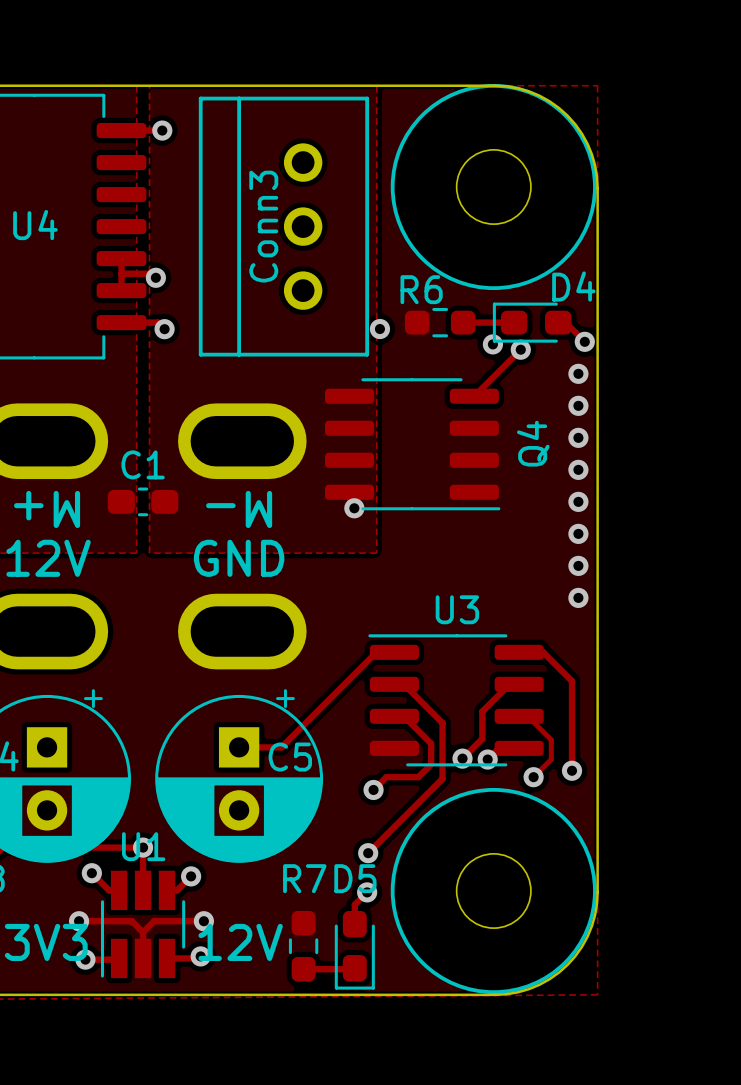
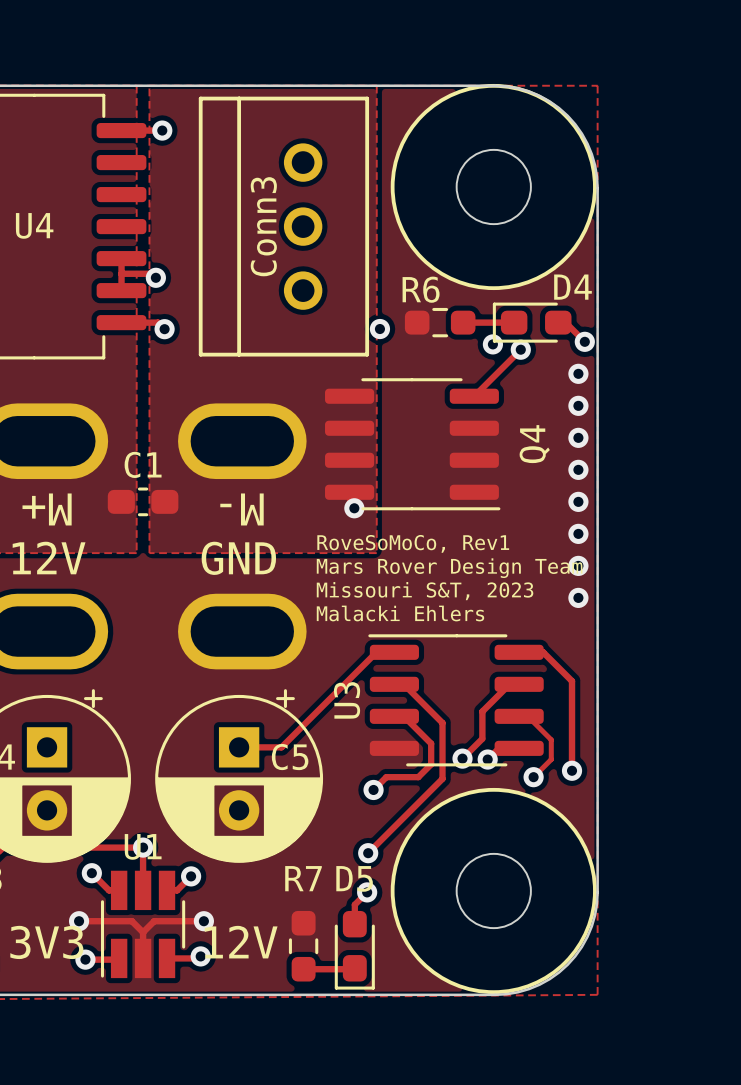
text: none -> RoveSoMoCo, Rev1 (413, 543)
text: none -> Mars Rover Design Team (449, 568)
text: none -> Missouri S&T, 2023 (425, 591)
U3 name rotation: 0° (457, 609) -> 90° counterclockwise (347, 700)
U3 name position: U3 (457, 609) -> U3 (347, 700)
text: none -> Malacki Ehlers (400, 613)

